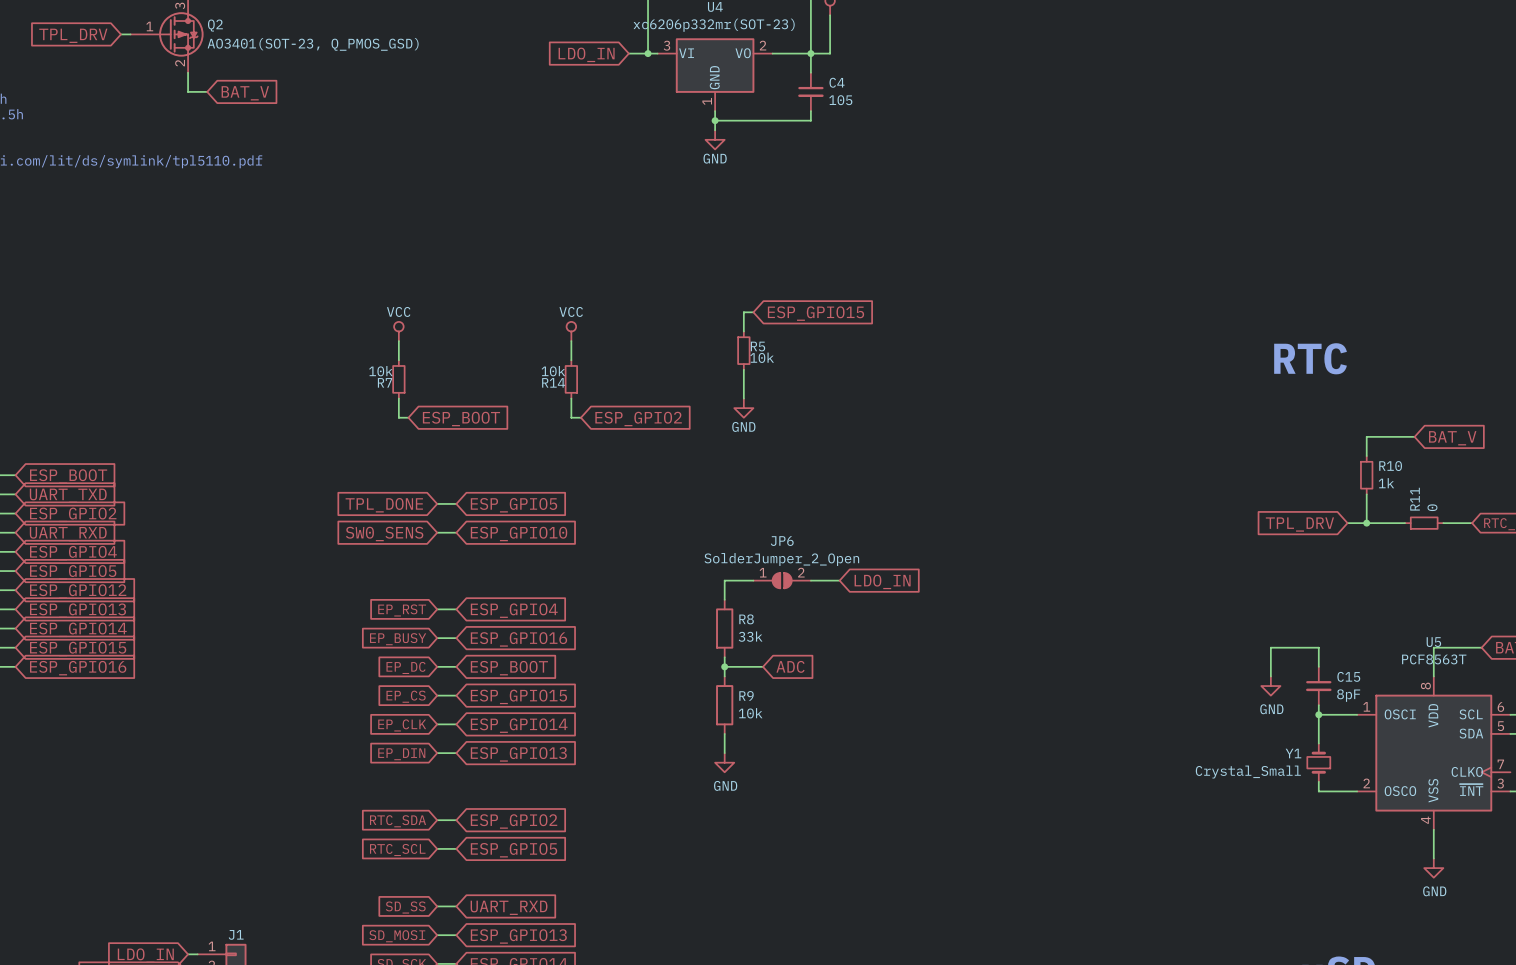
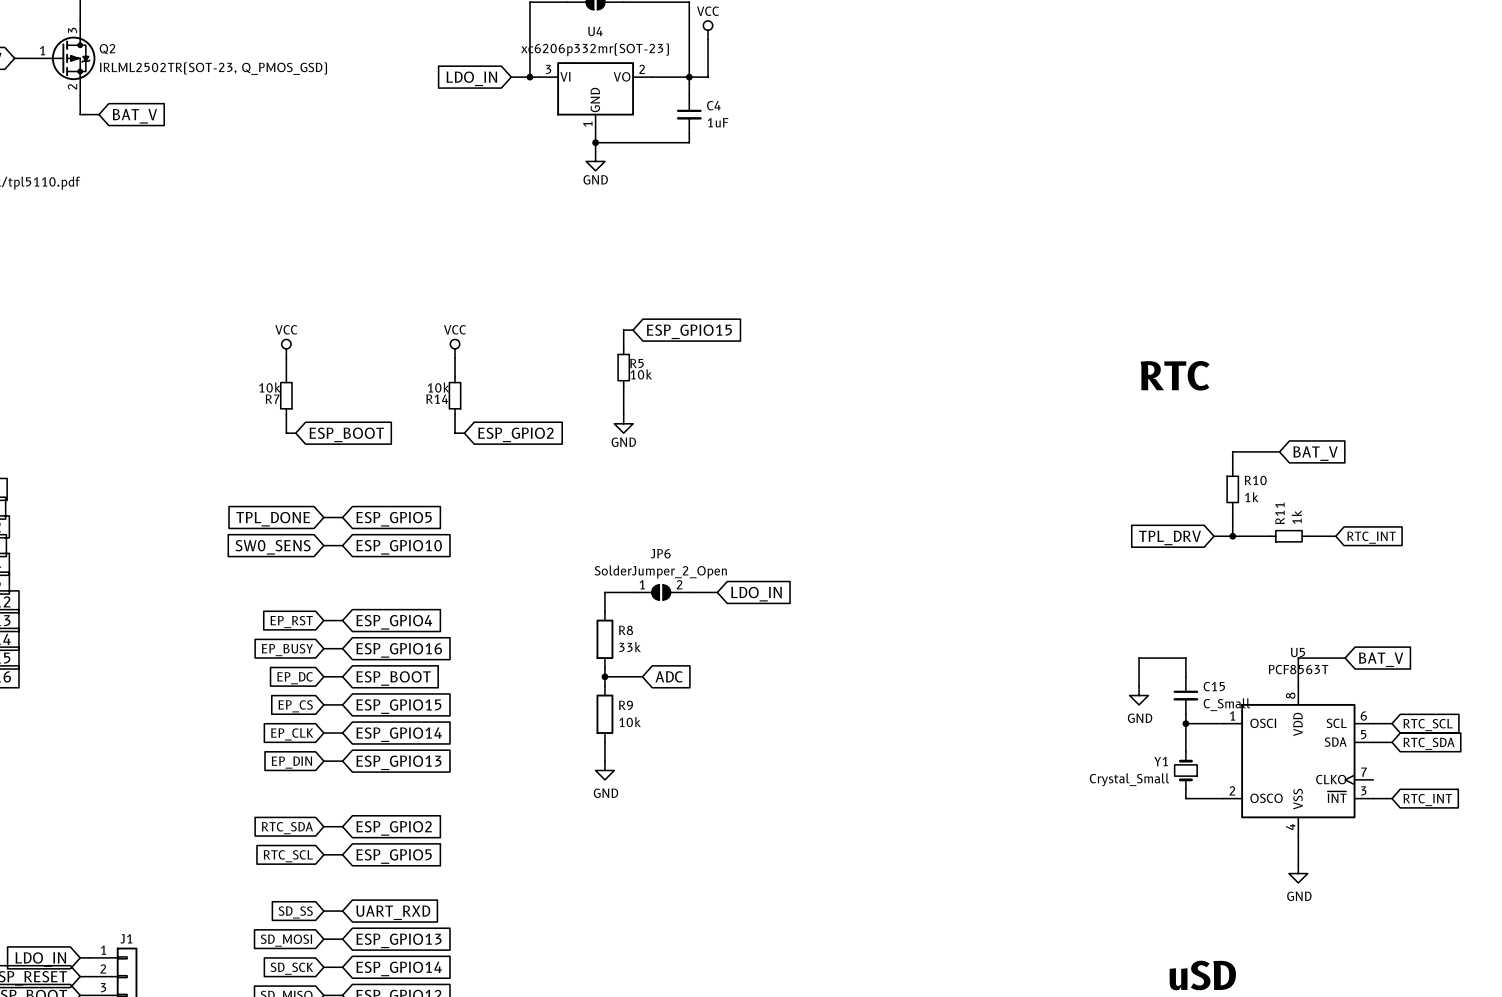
Q2 value: AO3401(SOT-23, Q_PMOS_GSD) (313, 44) -> IRLML2502TR(SOT-23, Q_PMOS_GSD) (213, 68)
C4 value: 105 (840, 100) -> 1uF (718, 122)
R11 value: 0 (1432, 507) -> 1k (1296, 517)
C15 value: 8pF (1348, 695) -> C_Small (1226, 704)

